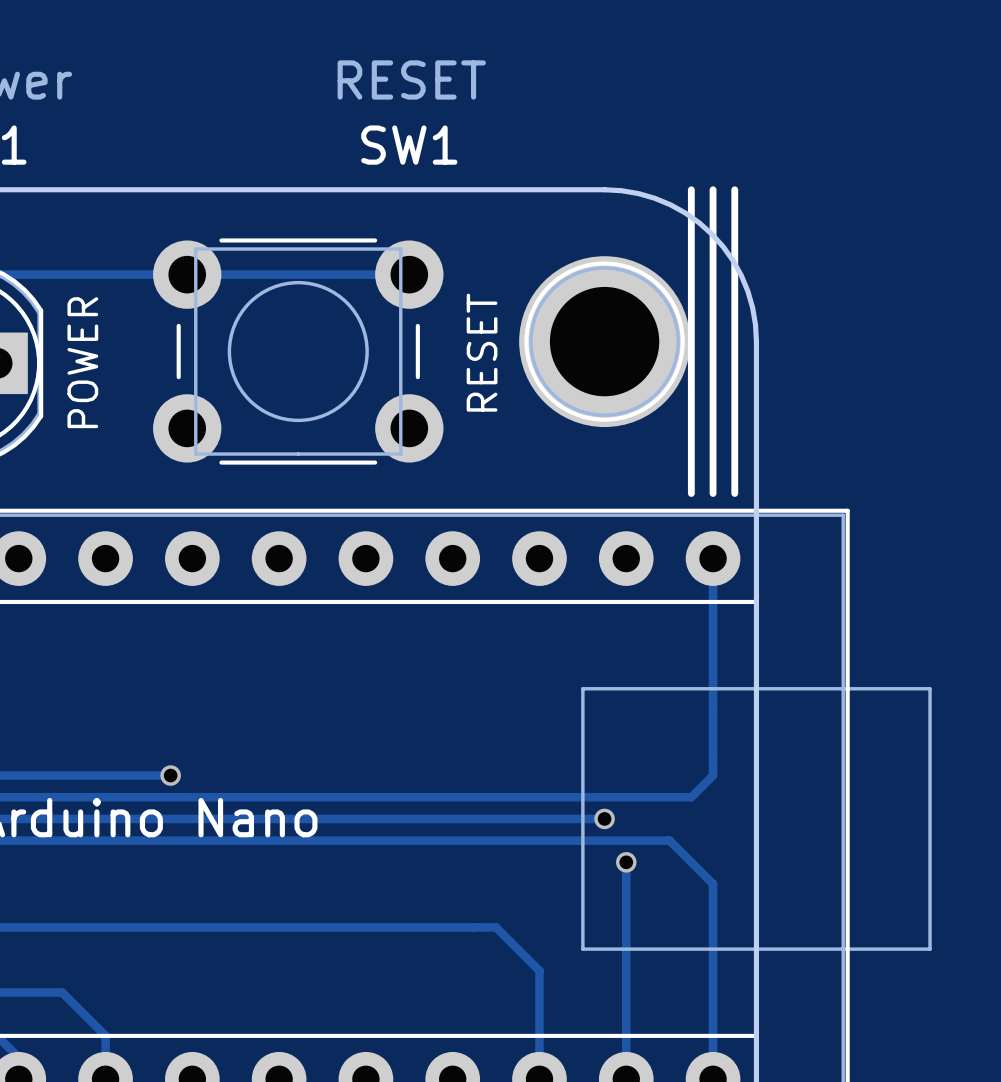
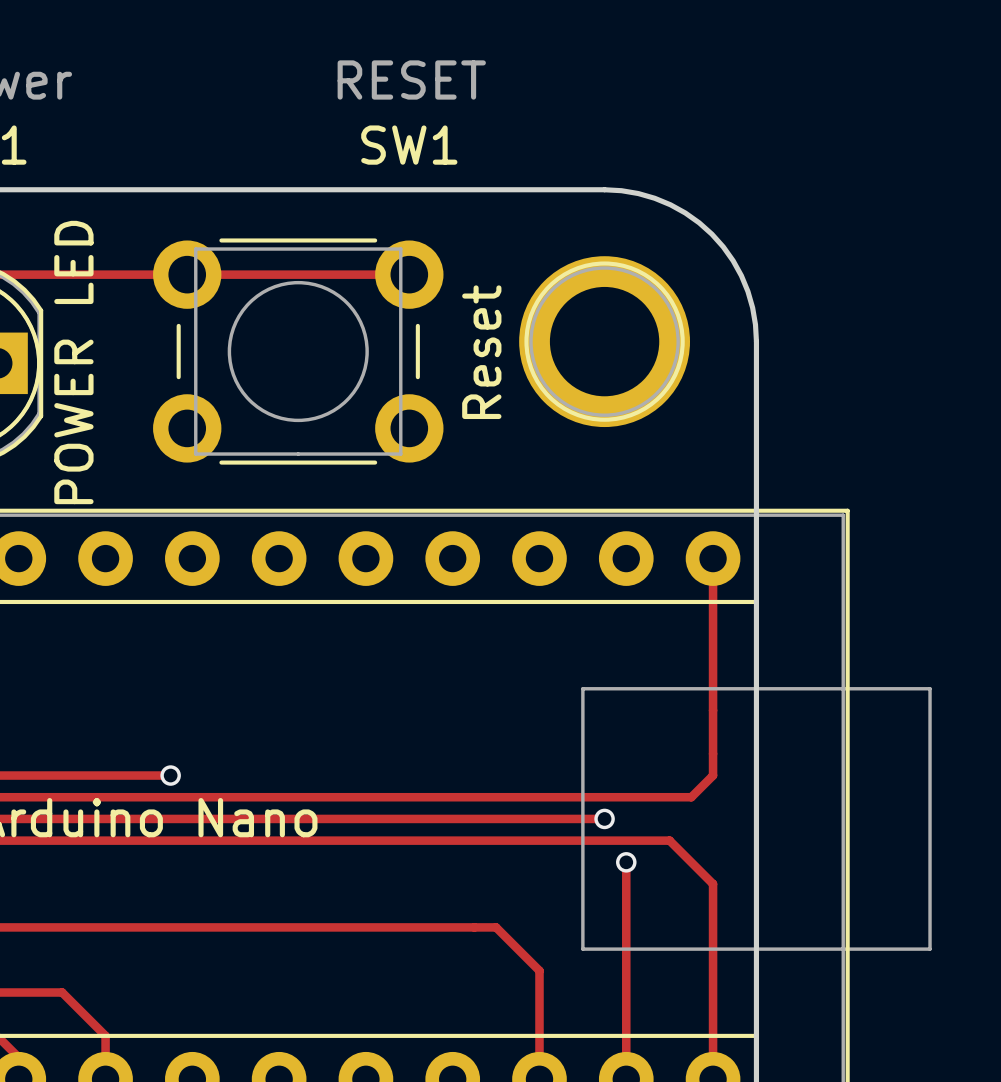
line: (691, 189) (691, 493) -> none
line: (713, 189) (713, 493) -> none
line: (734, 189) (734, 493) -> none
text: RESET (482, 352) -> Reset (481, 352)
text: POWER (82, 362) -> POWER LED (73, 362)

